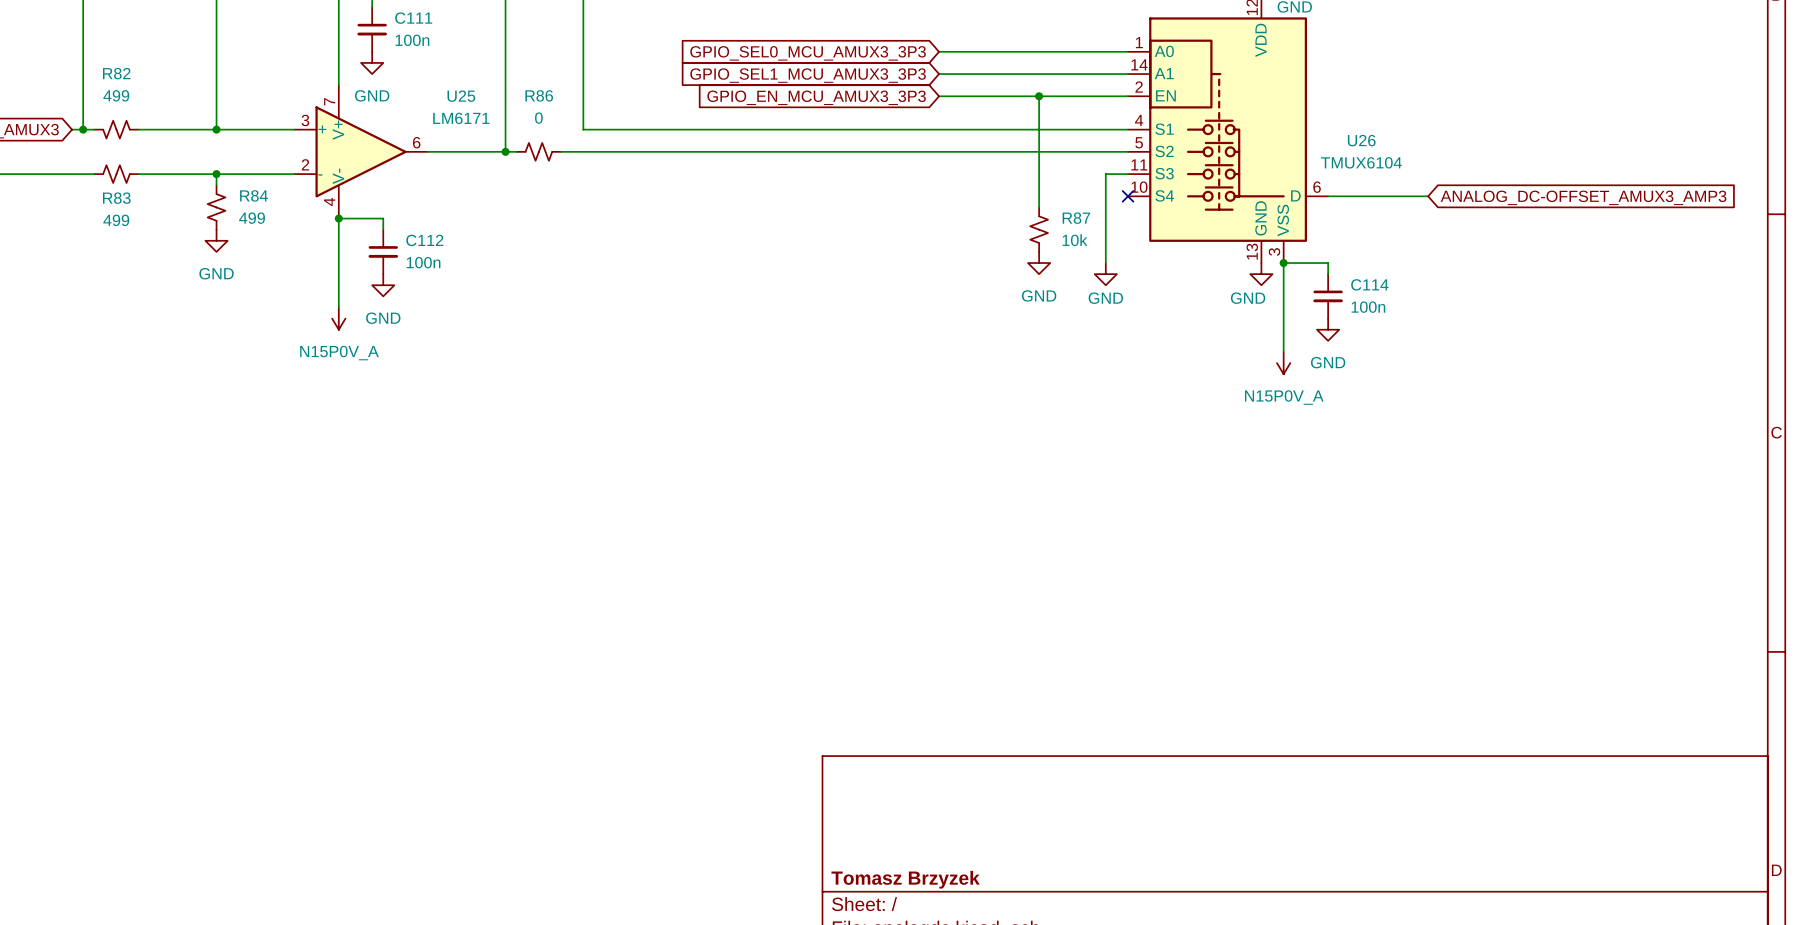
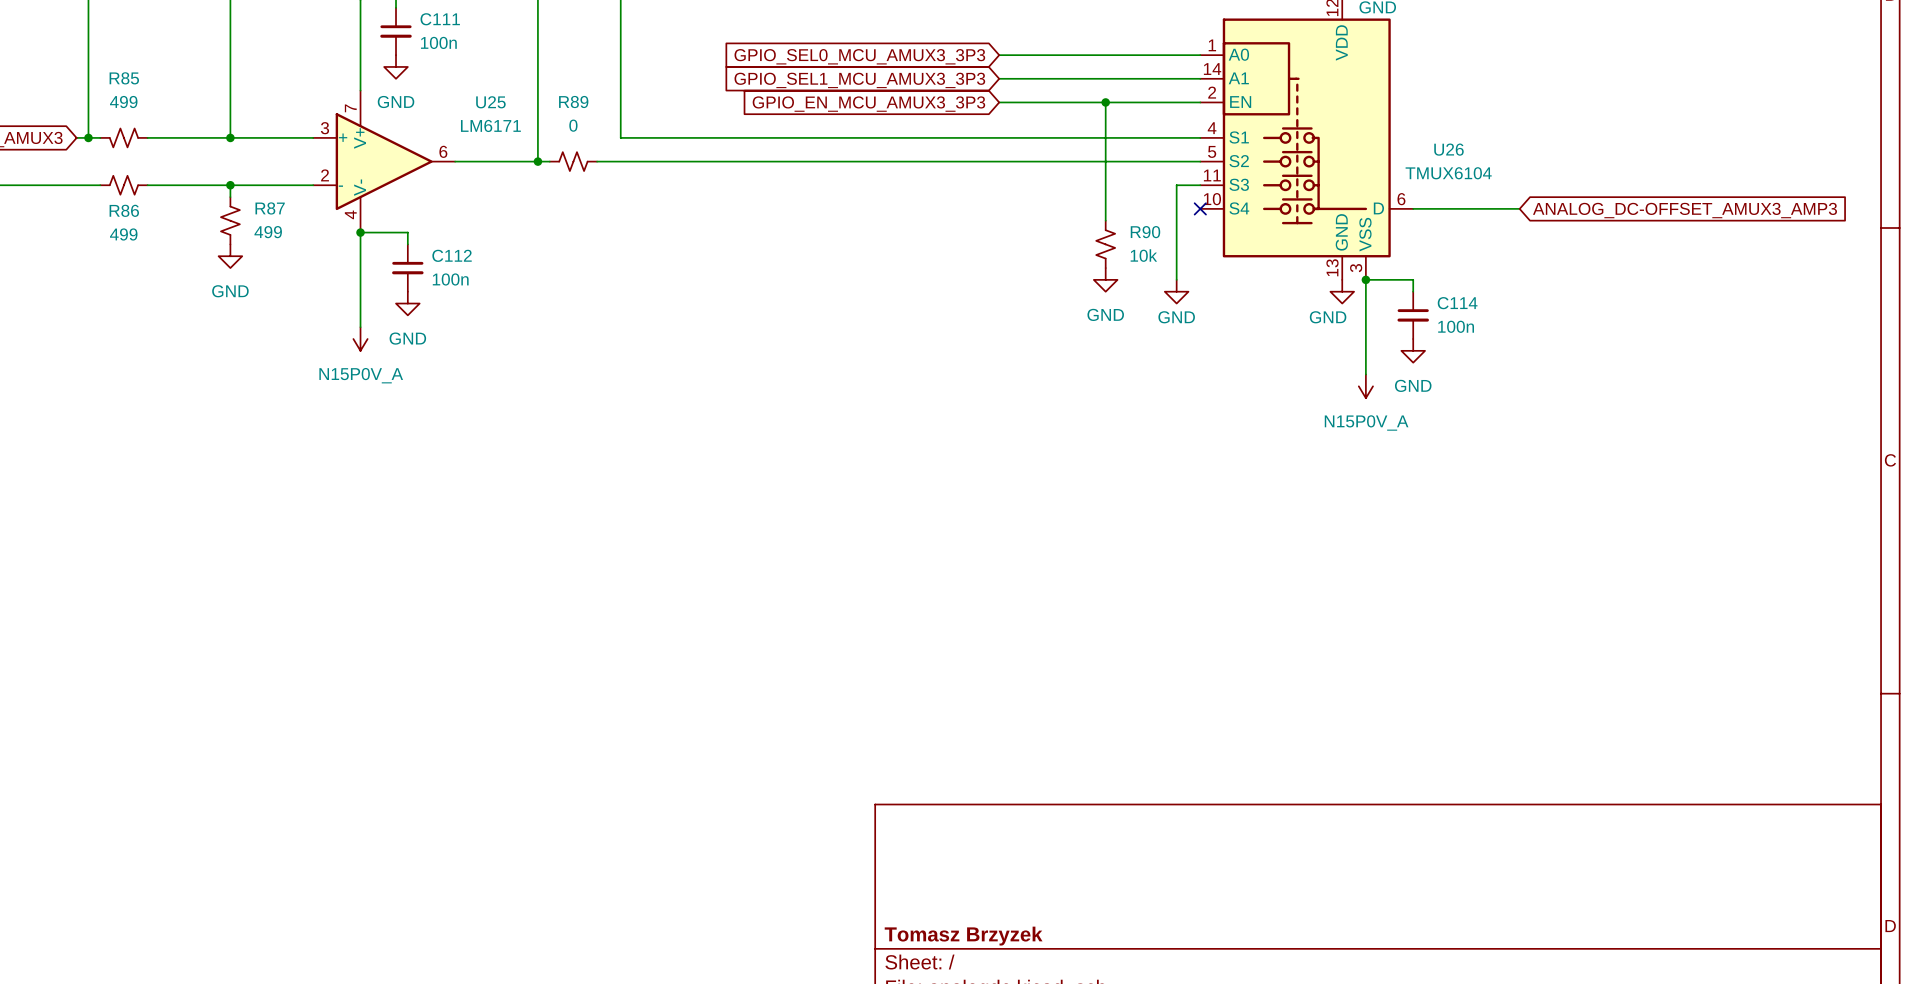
R82 name: R82 (116, 73) -> R85 (124, 78)
R86 name: R86 (539, 95) -> R89 (573, 102)
R84 name: R84 (254, 195) -> R87 (270, 208)
R83 name: R83 (116, 198) -> R86 (124, 210)
R87 name: R87 (1076, 218) -> R90 (1145, 232)

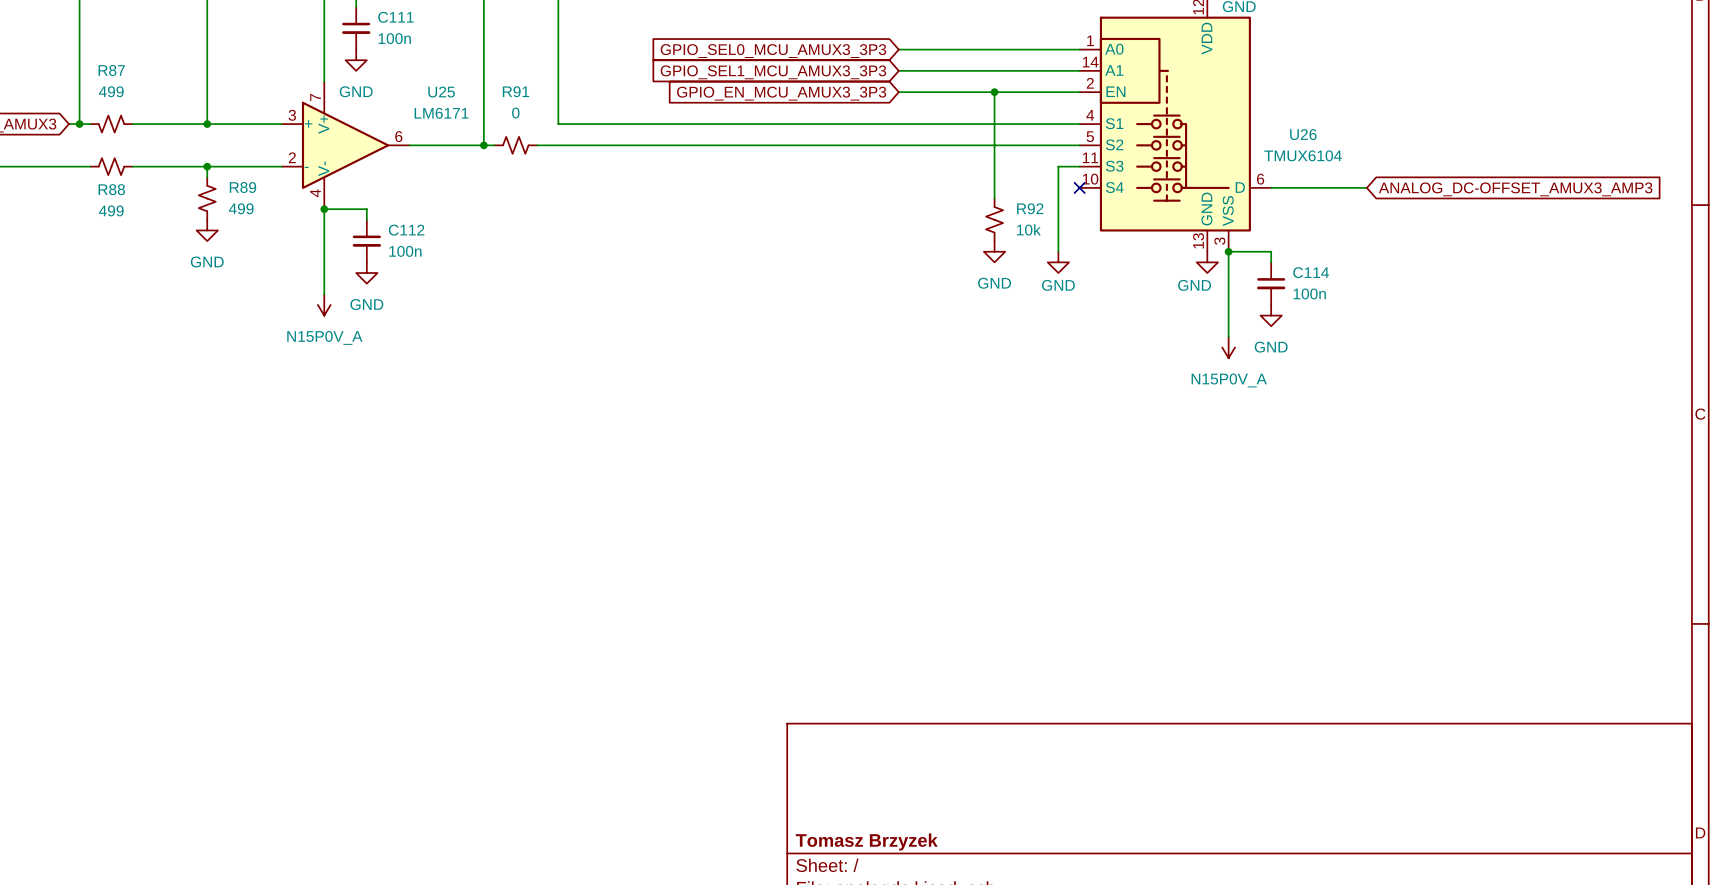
R85 name: R85 (124, 78) -> R87 (111, 70)
R89 name: R89 (573, 102) -> R91 (516, 91)
R87 name: R87 (270, 208) -> R89 (242, 187)
R86 name: R86 (124, 210) -> R88 (111, 189)
R90 name: R90 (1145, 232) -> R92 (1030, 208)

